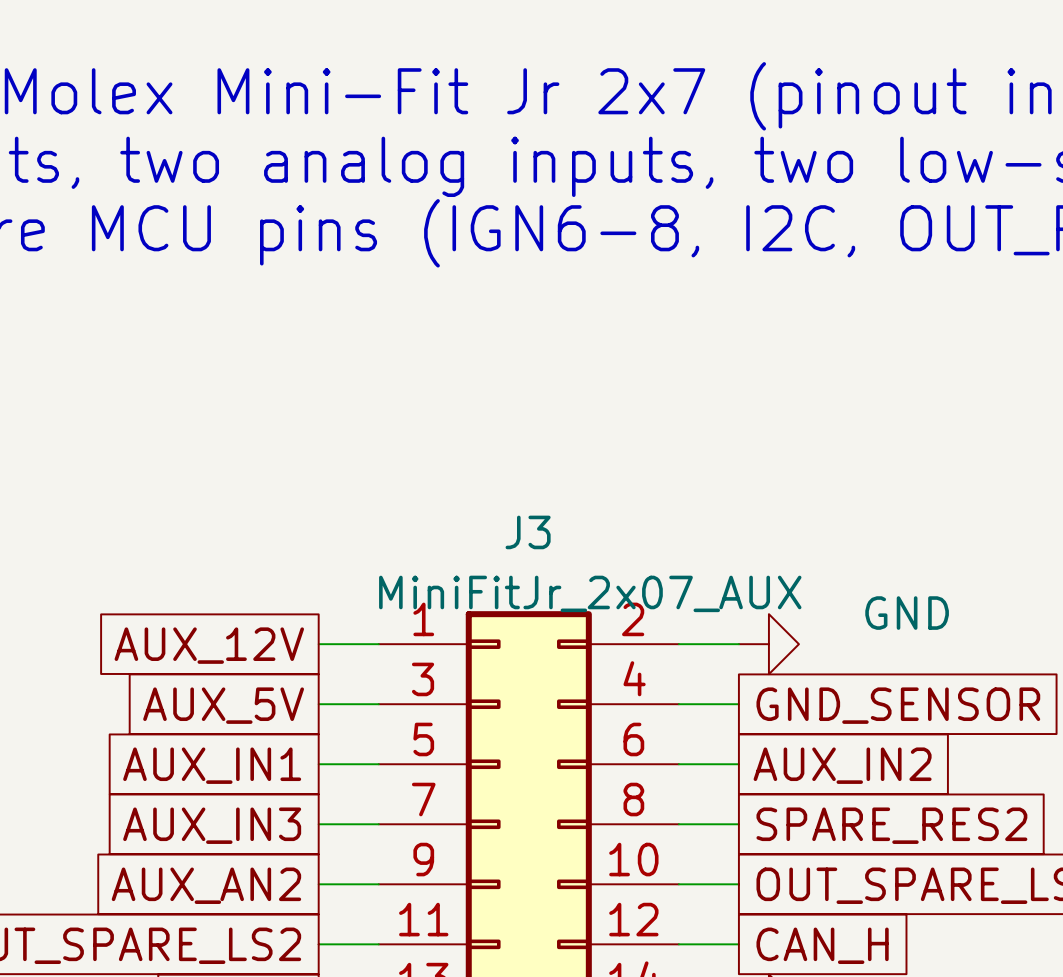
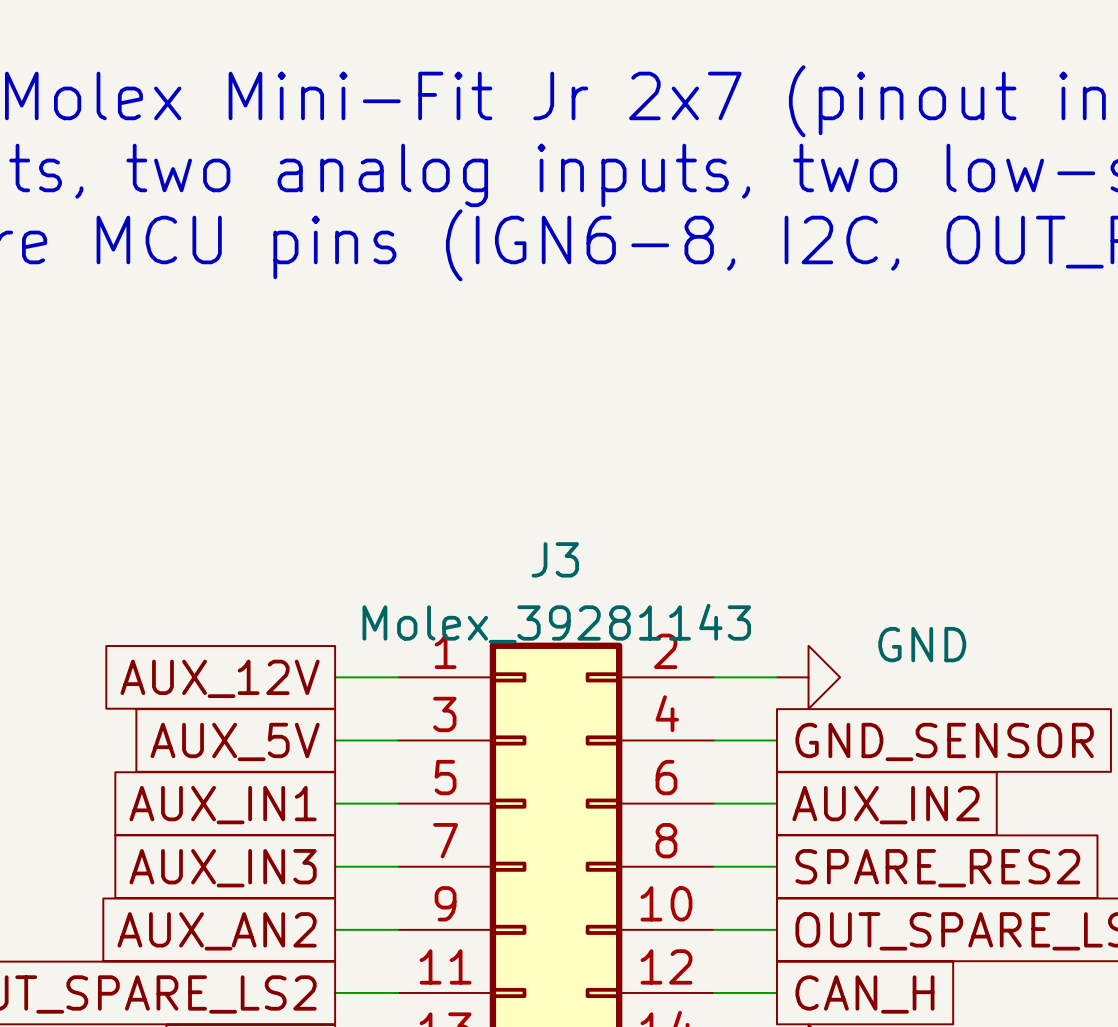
J3 value: MiniFitJr_2x07_AUX (590, 593) -> Molex_39281143 (556, 623)
power symbol text position: GND (907, 613) -> GND (922, 644)

